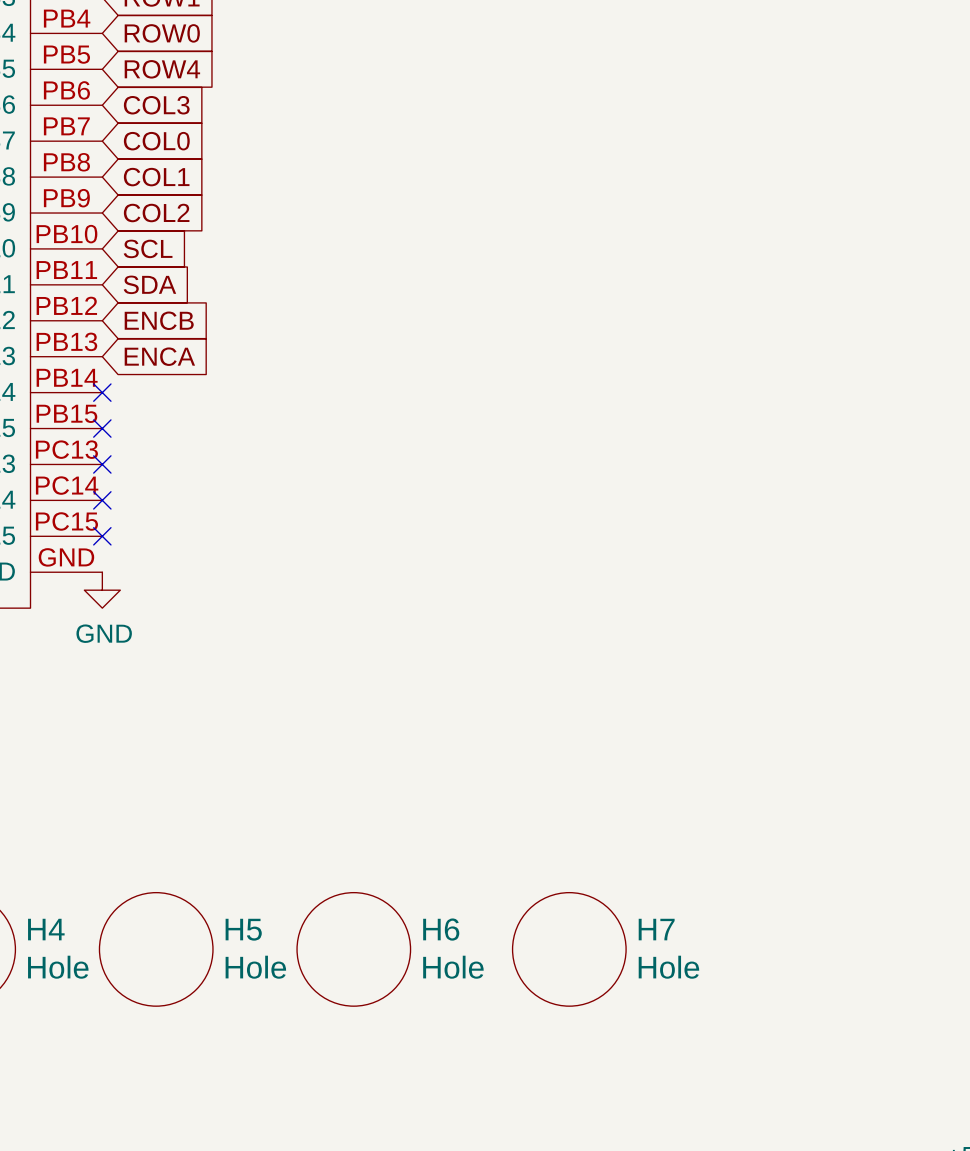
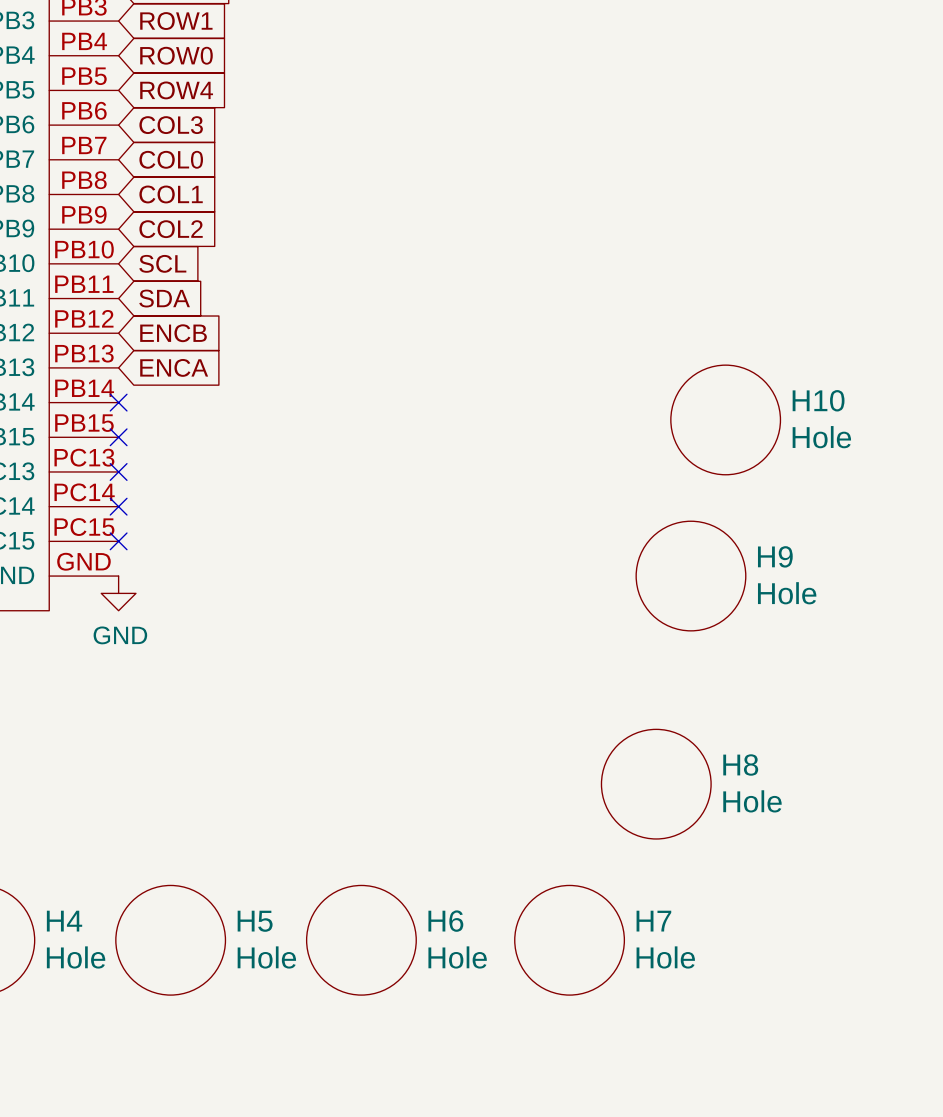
H10: none -> Hole (725, 419)
H9: none -> Hole (690, 576)
H8: none -> Hole (656, 784)

